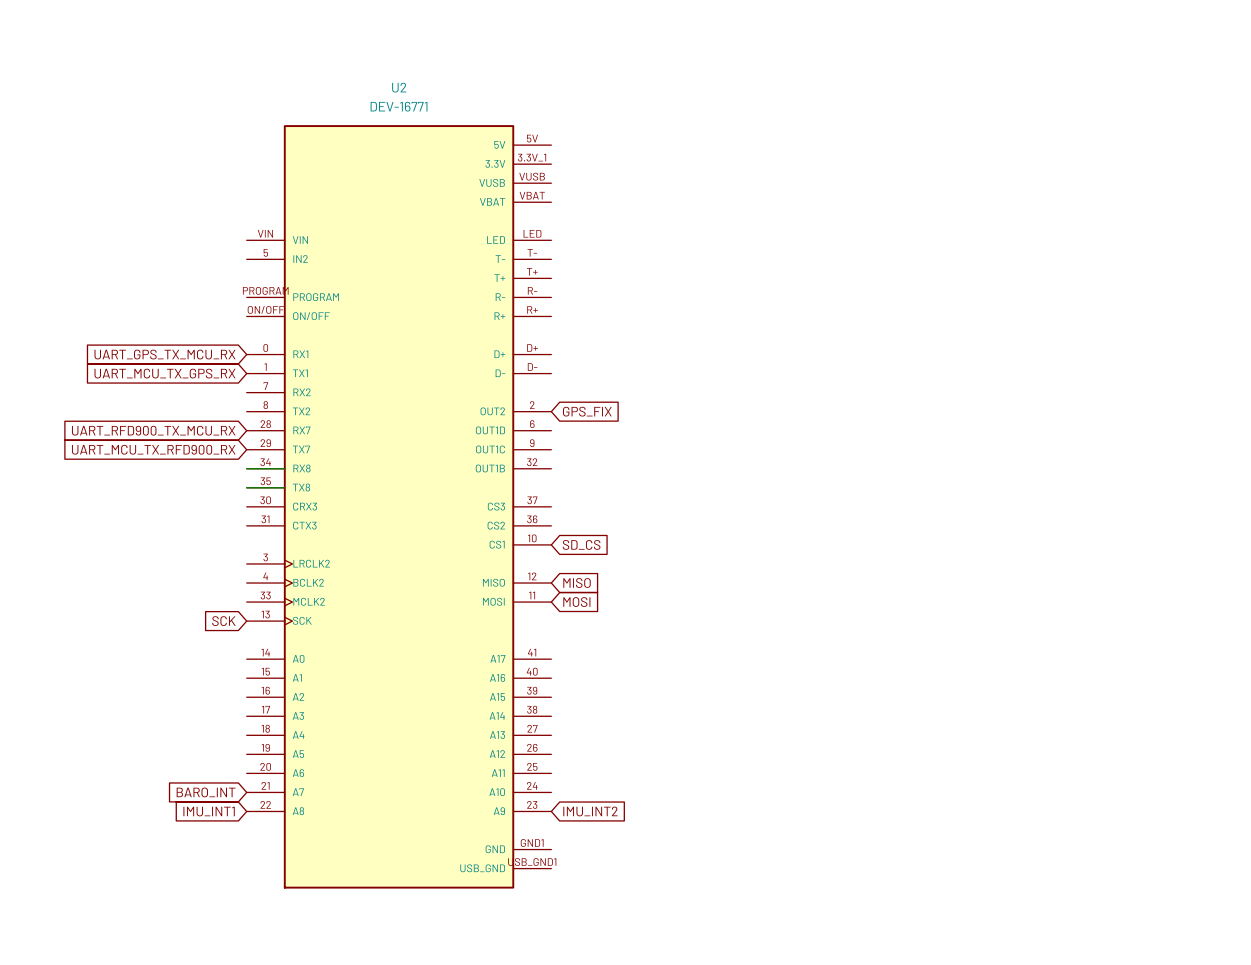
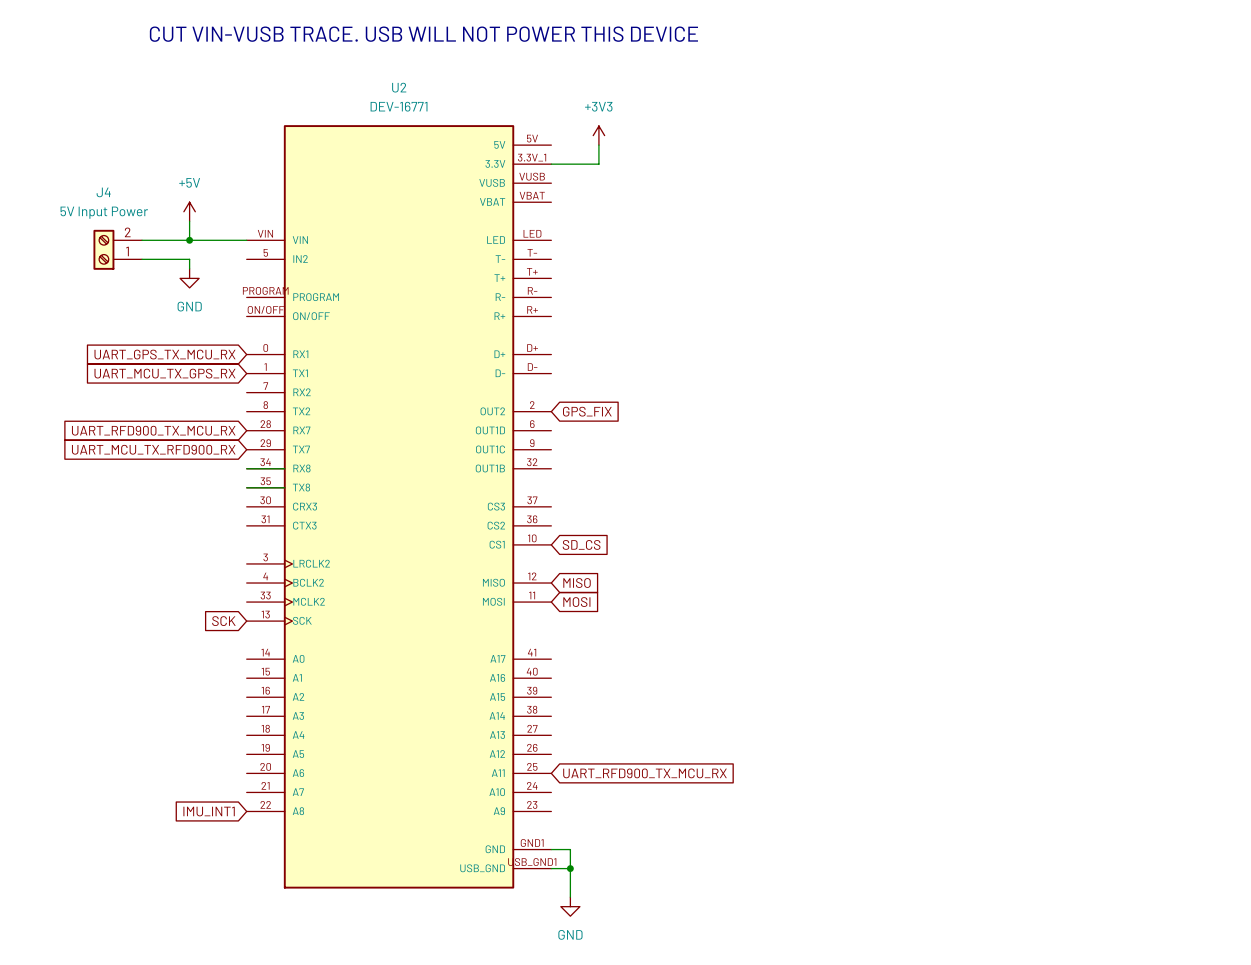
text: none -> CUT VIN-VUSB TRACE. USB WILL NOT POWER THIS DEVICE (423, 34)
power symbol: none -> +3V3 (598, 135)
wire: none -> (598, 145) (598, 164) (551, 164)
power symbol: none -> +5V (189, 211)
wire: none -> (189, 221) (189, 240)
wire: none -> (142, 240) (246, 240)
junction: none -> (189, 240)
J4: none -> 5V Input Power (117, 249)
wire: none -> (142, 259) (189, 259) (189, 268)
power symbol: none -> GND (189, 278)
global label: none -> UART_RFD900_TX_MCU_RX (644, 773)
global label: BARO_INT (206, 792) -> none
global label: IMU_INT2 (590, 811) -> none
wire: none -> (551, 849) (570, 849) (570, 897)
wire: none -> (551, 868) (570, 868)
junction: none -> (570, 868)
power symbol: none -> GND (570, 906)

